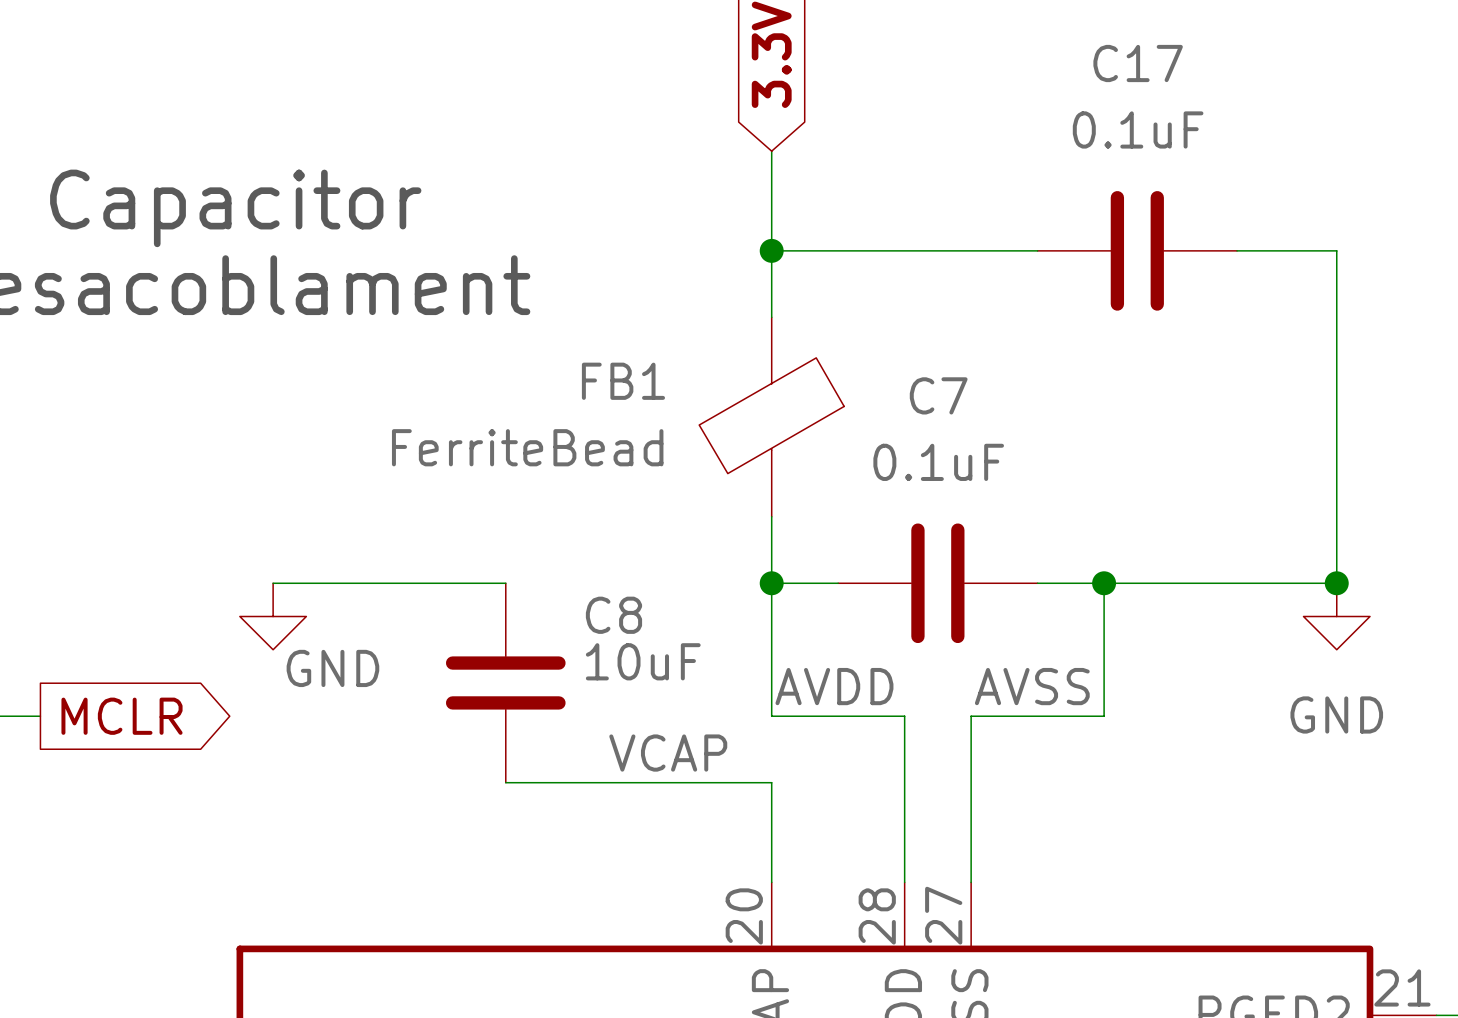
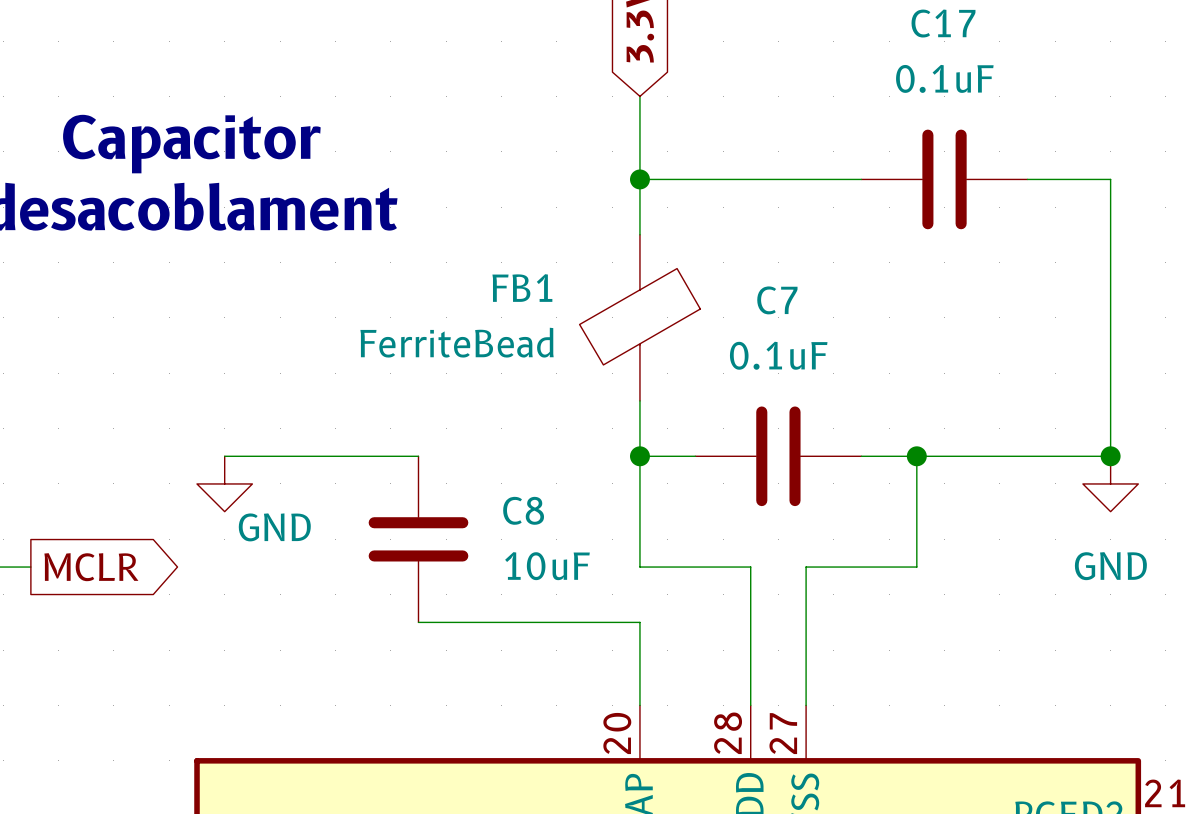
C8 name position: C8 (613, 615) -> C8 (523, 510)
C8 value position: 10uF (643, 661) -> 10uF (547, 566)
label: AVDD (834, 686) -> none
label: AVSS (1032, 686) -> none
label: VCAP (668, 753) -> none

